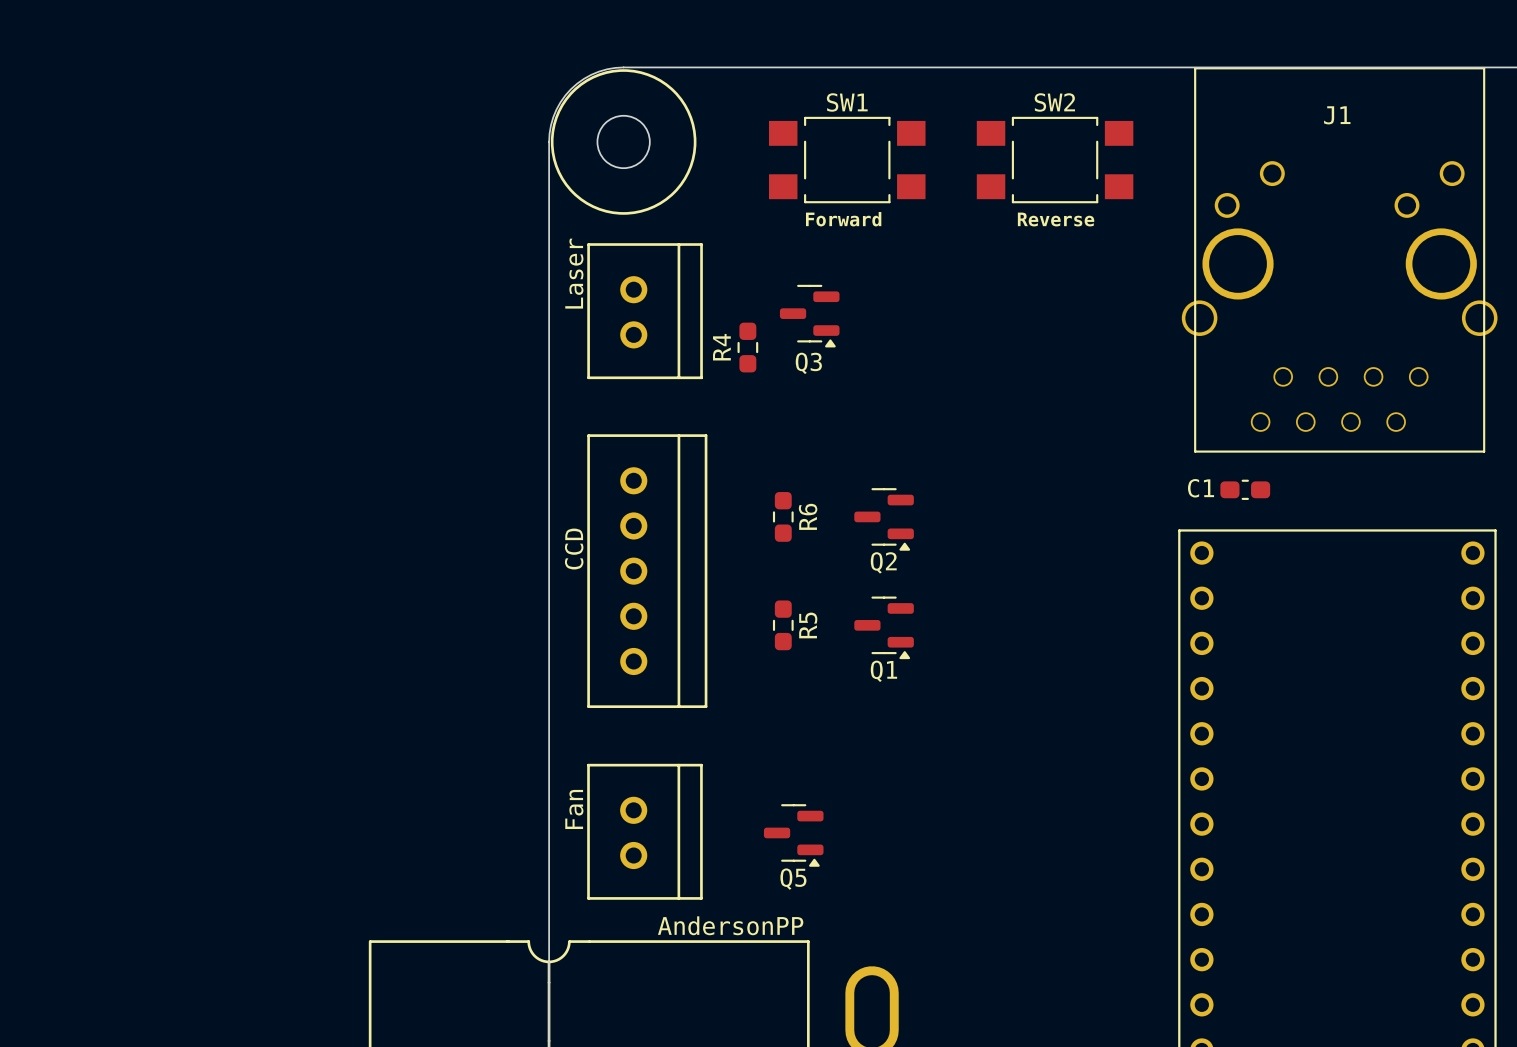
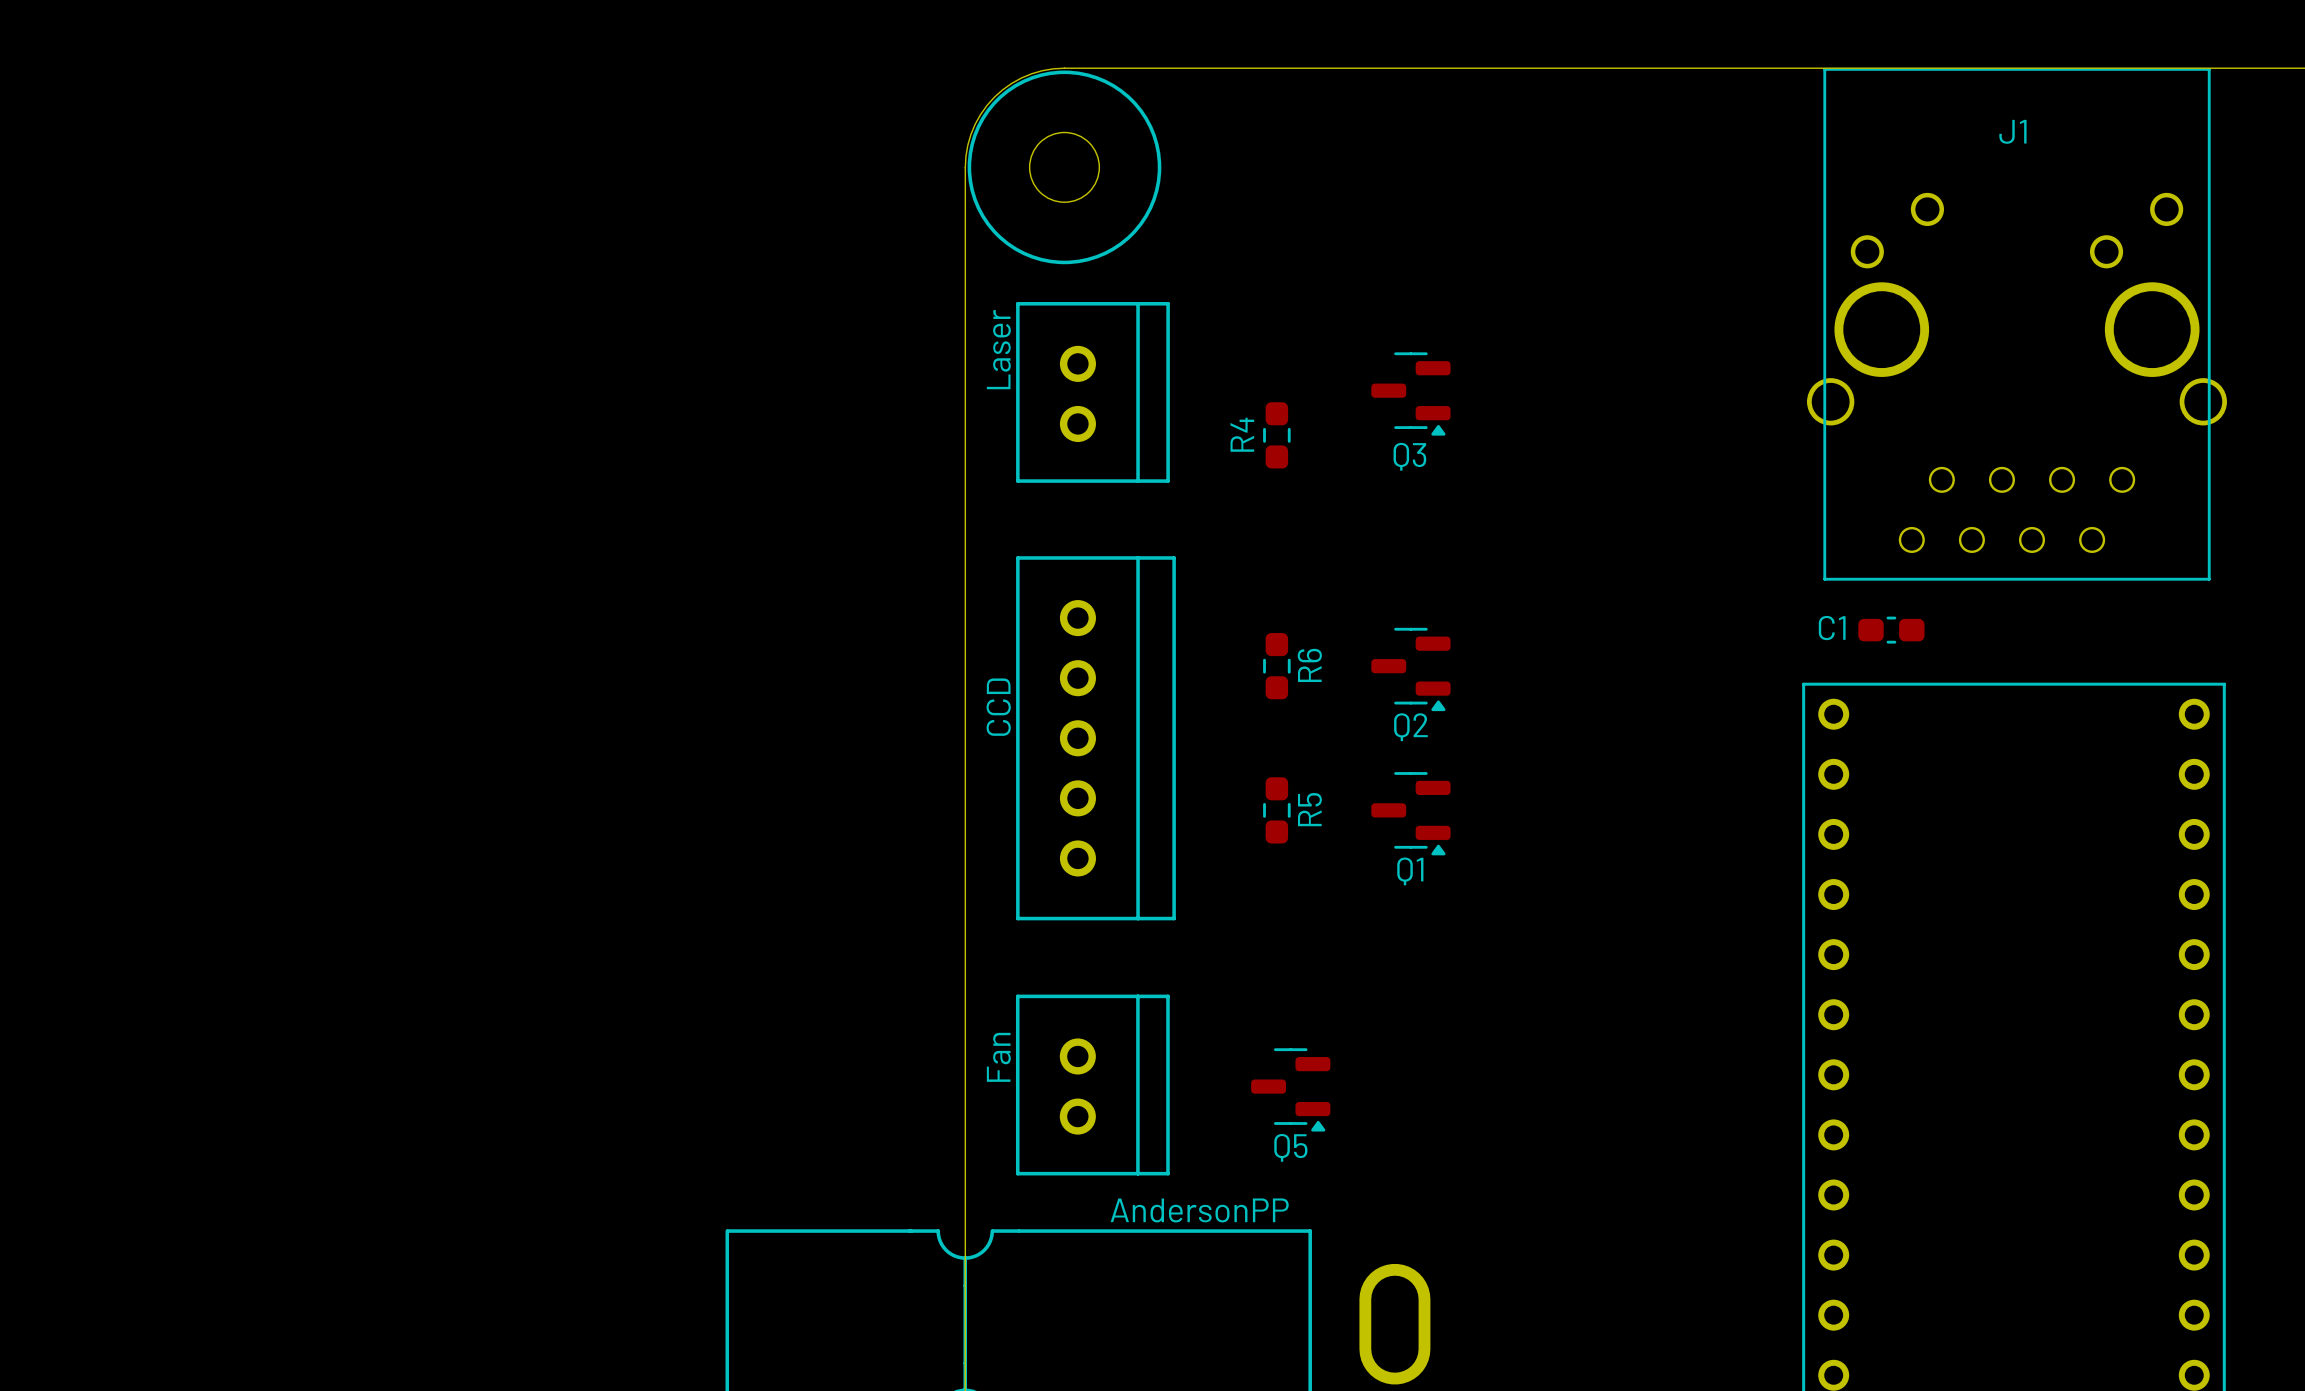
SW1: (847, 160) -> none
SW2: (1055, 160) -> none
text: Forward (843, 219) -> none
text: Reverse (1056, 219) -> none
Q3 position: (809, 316) -> (1410, 393)
R4 position: (747, 347) -> (1276, 435)

